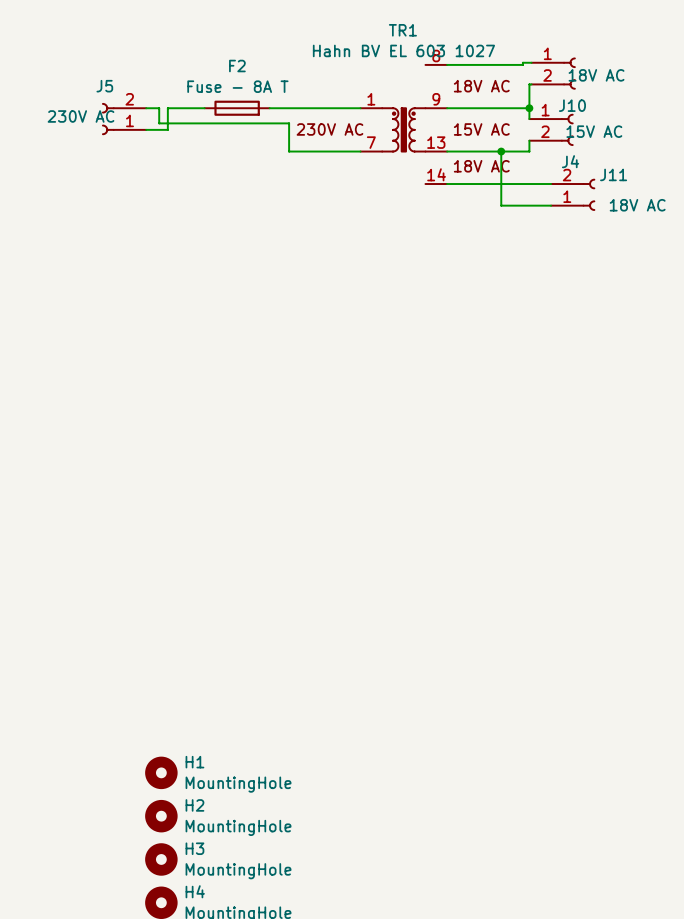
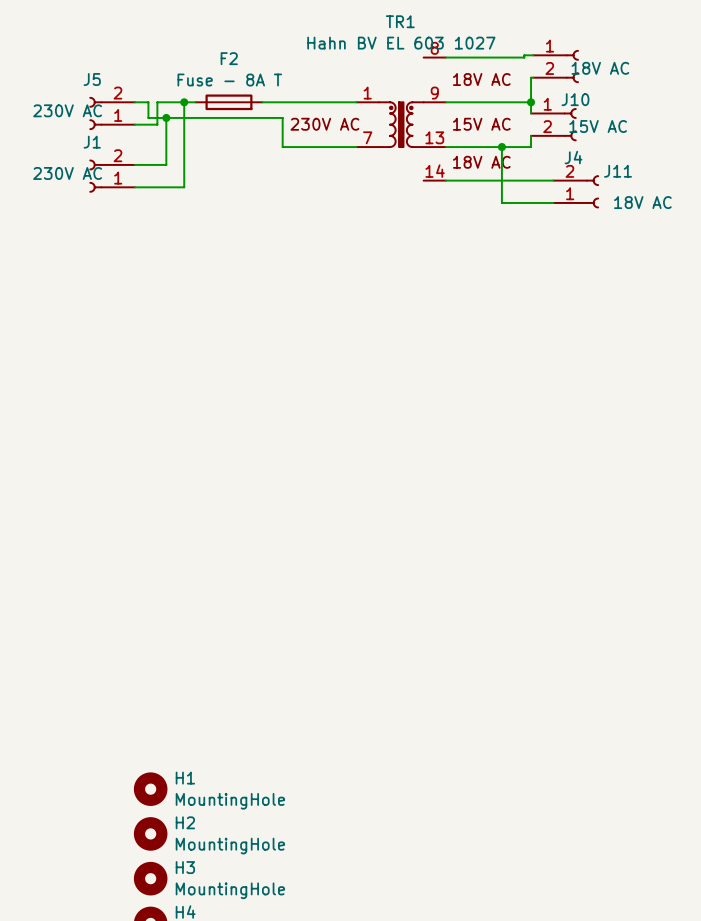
wire: none -> (184, 102) (184, 187) (135, 187)
junction: none -> (184, 102)
wire: none -> (166, 117) (166, 164) (135, 164)
junction: none -> (166, 117)
J1: none -> 230V AC (112, 176)

